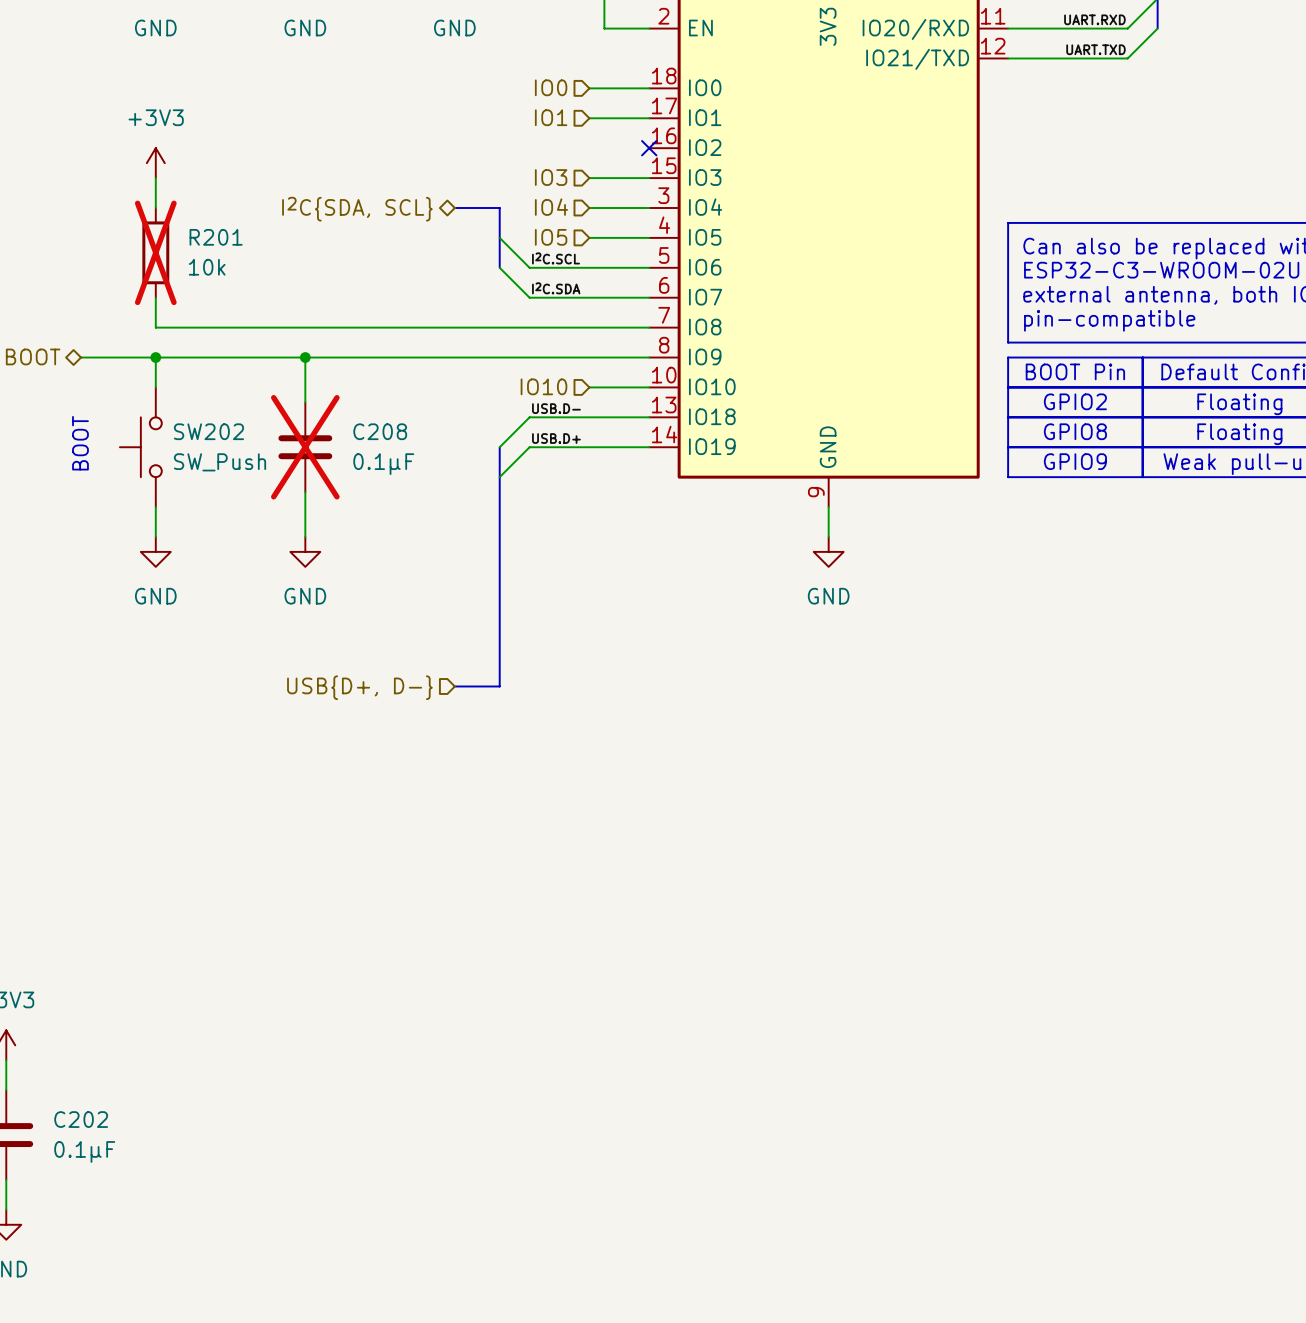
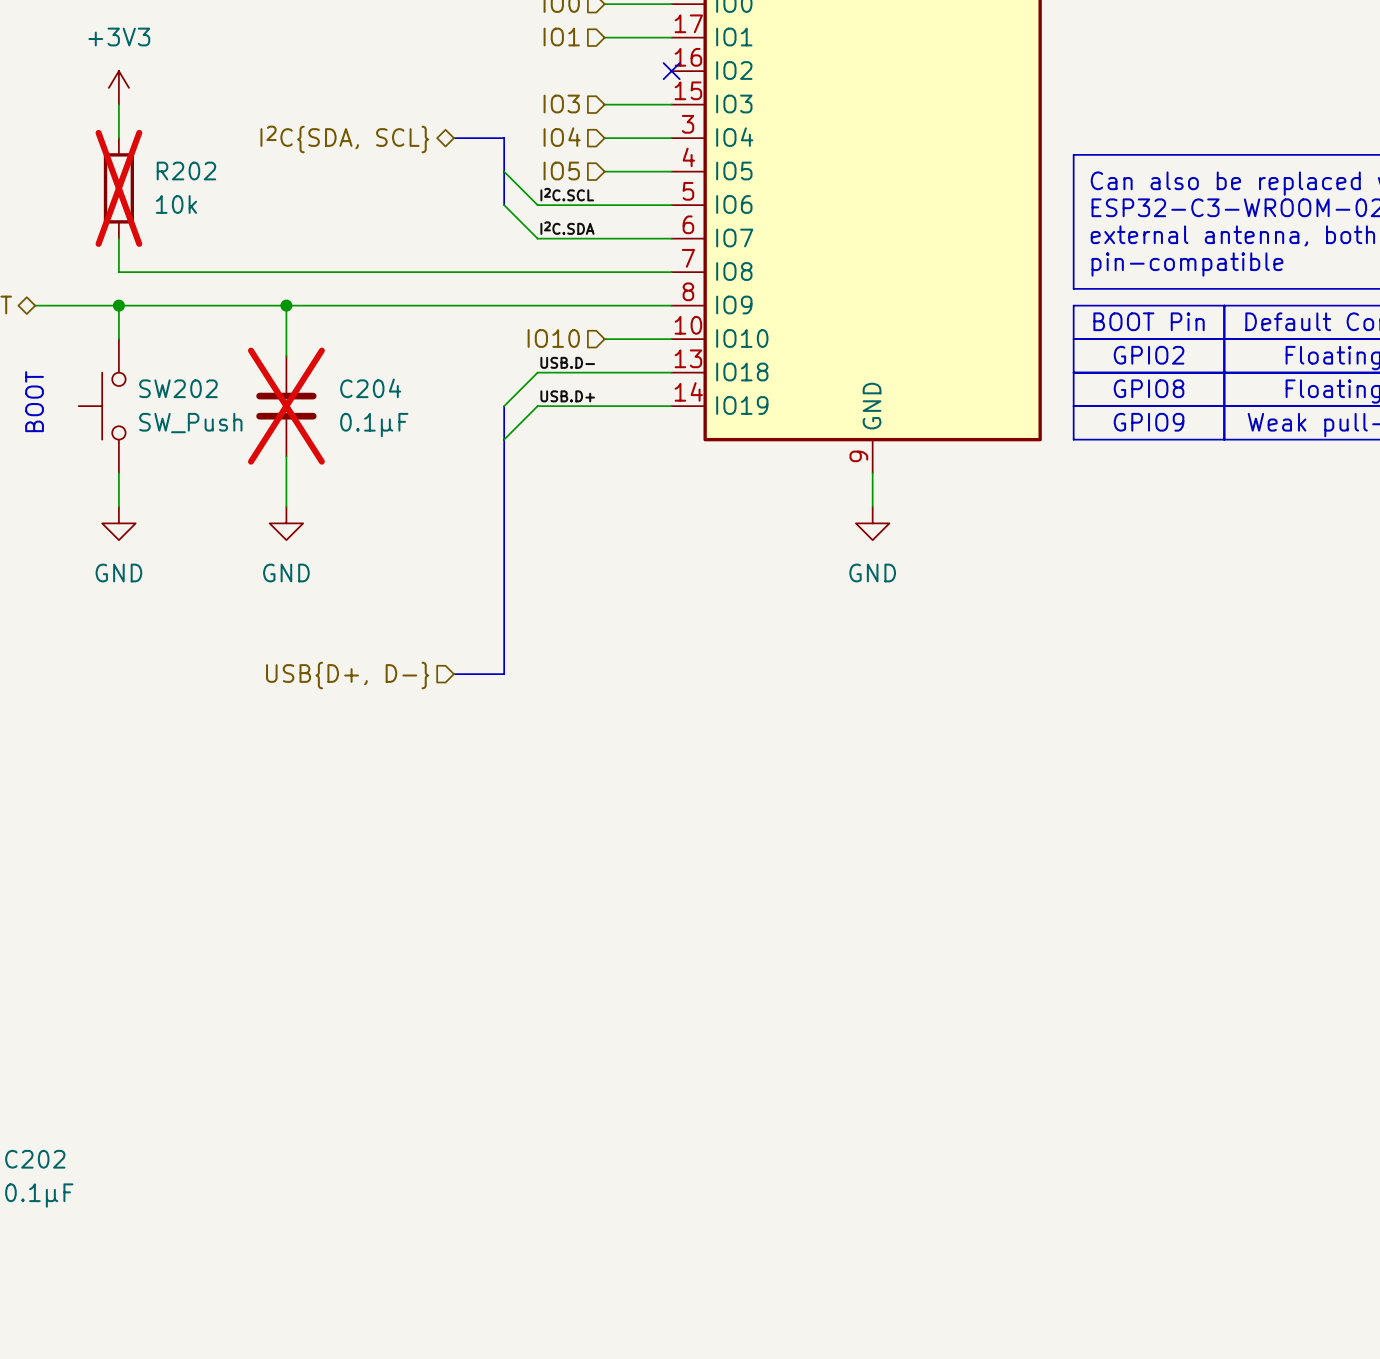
R201 name: R201 (216, 237) -> R202 (186, 171)
C208 name: C208 (380, 431) -> C204 (370, 388)

